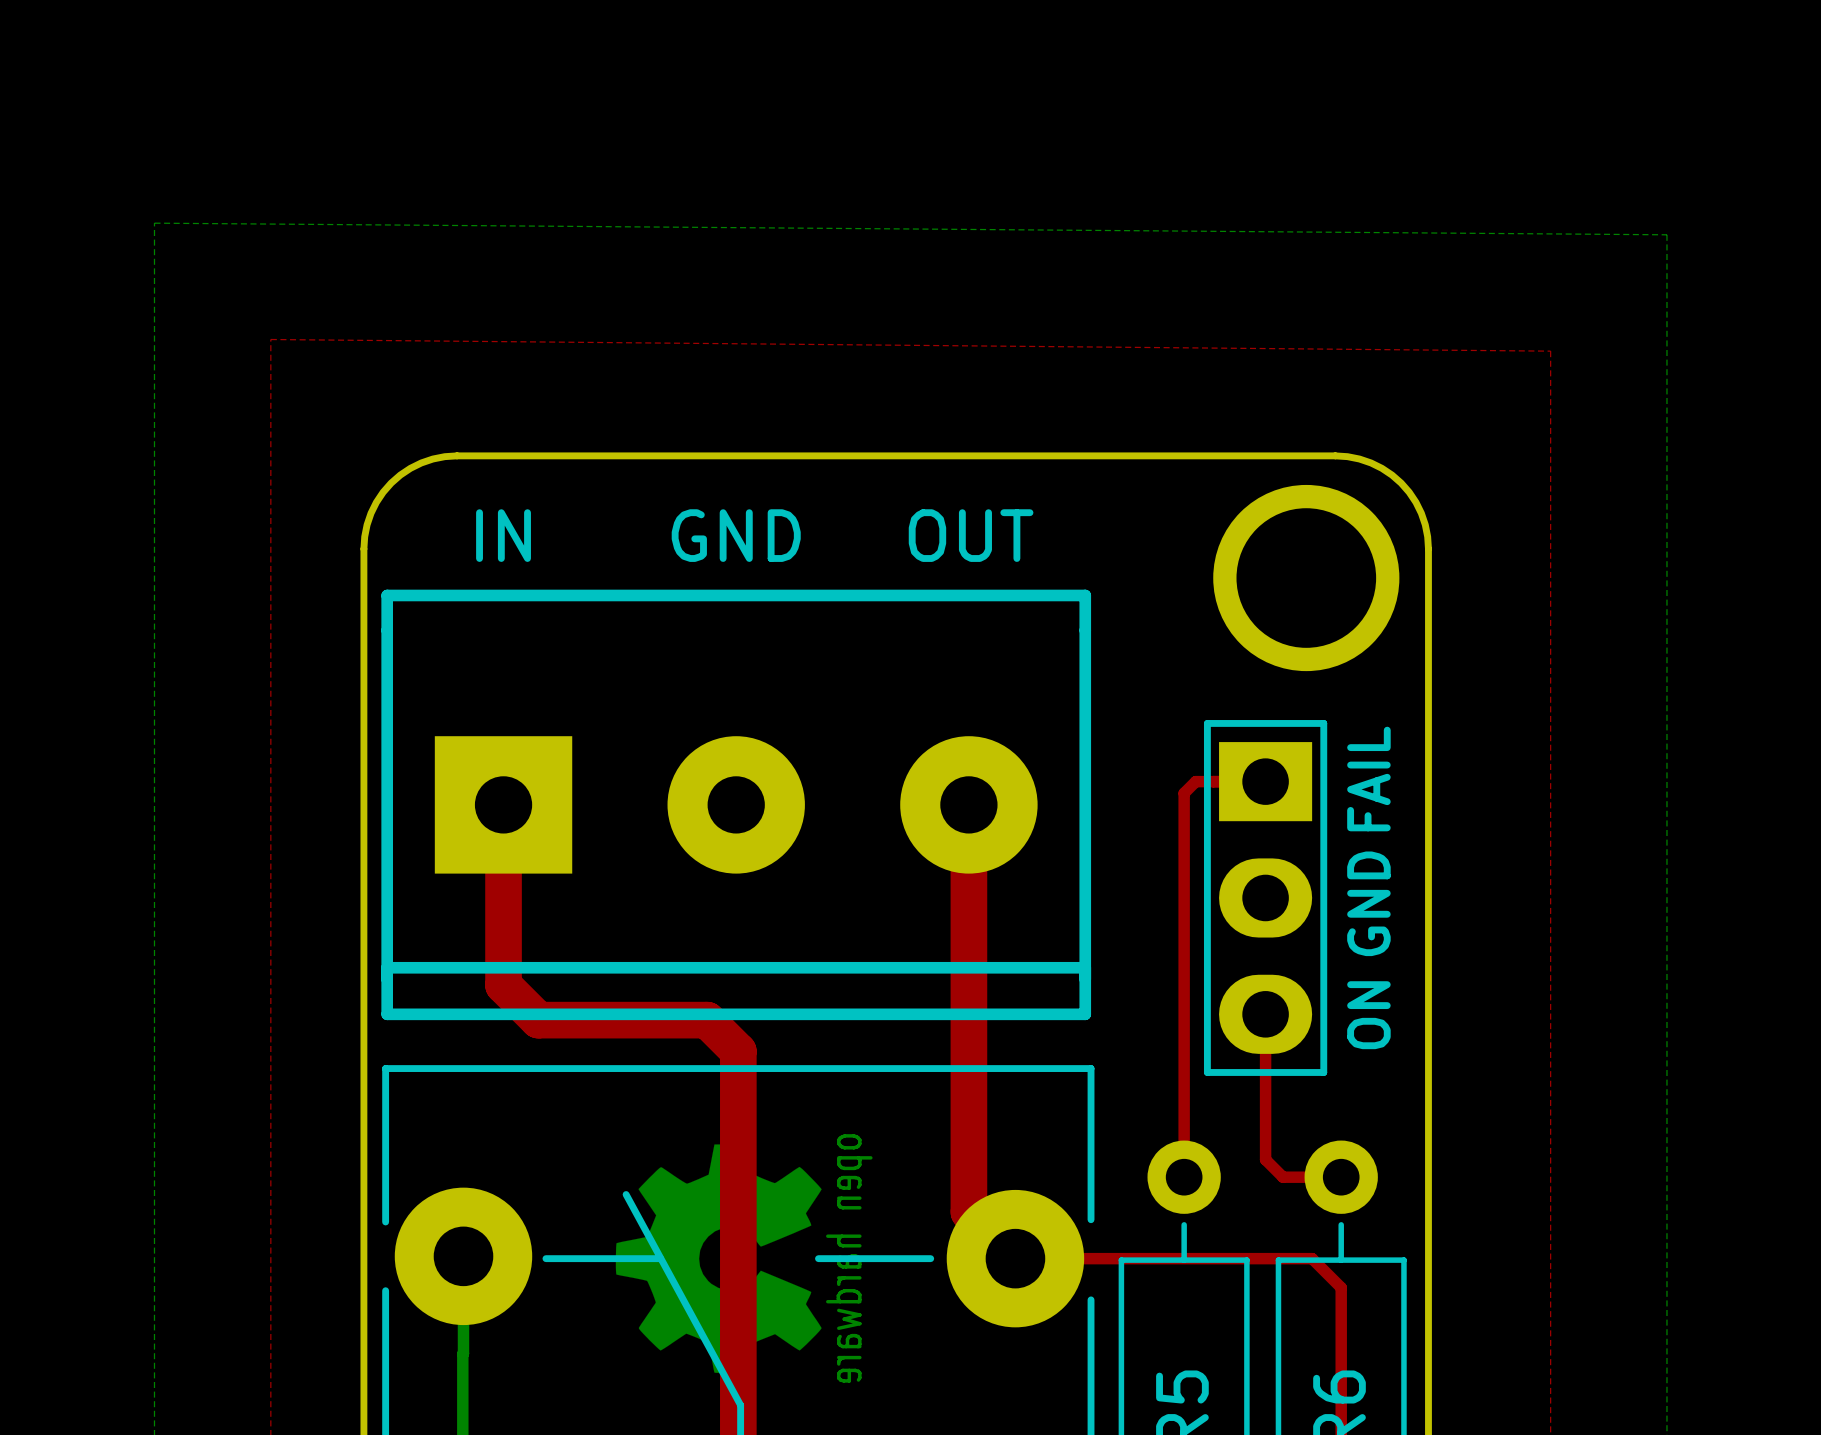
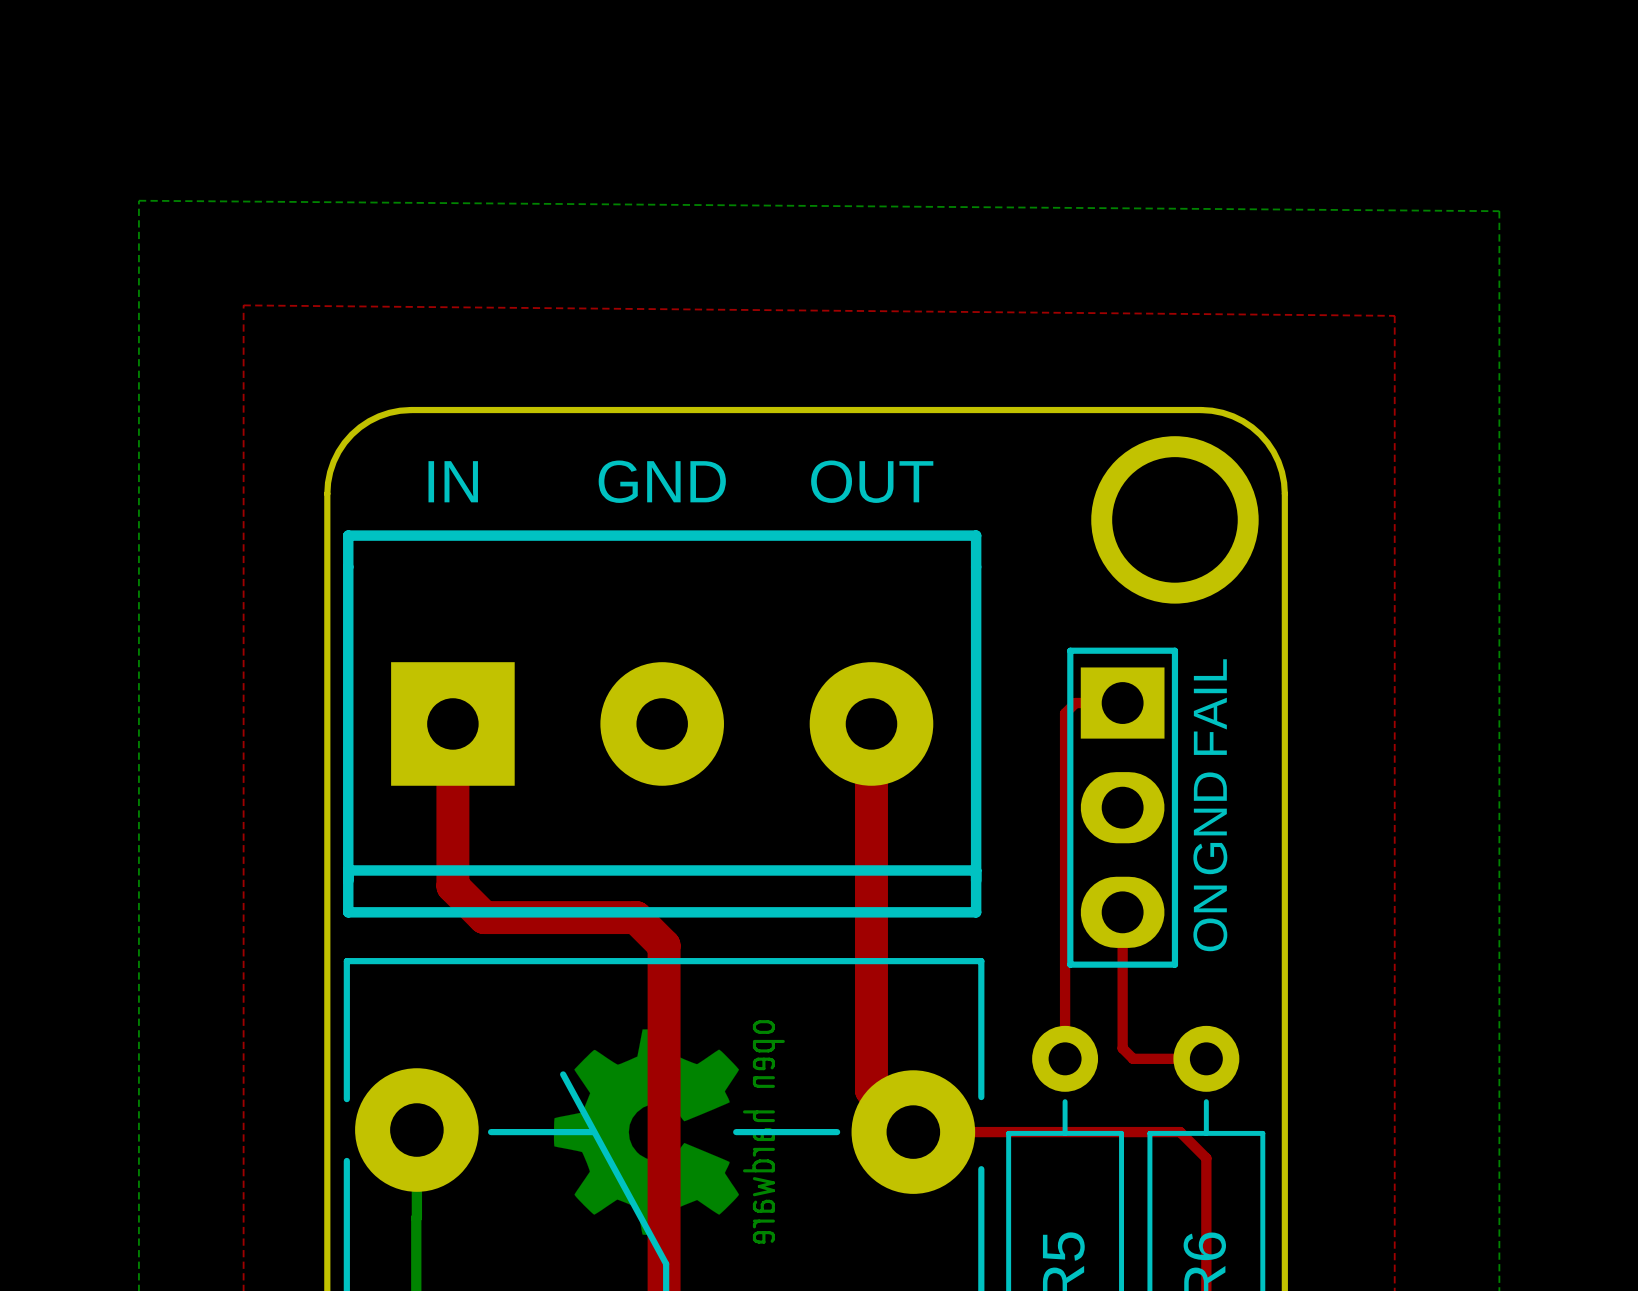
text position: FAIL (1368, 779) -> FAIL (1210, 707)
part position: (1265, 897) -> (1122, 807)
text position: GND (1368, 903) -> GND (1210, 823)
top track: (1265, 1014) (1265, 1159) (1283, 1177) -> (1122, 912) (1122, 1048) (1133, 1058) (1154, 1058)
text position: ON (1368, 1015) -> ON (1210, 918)

